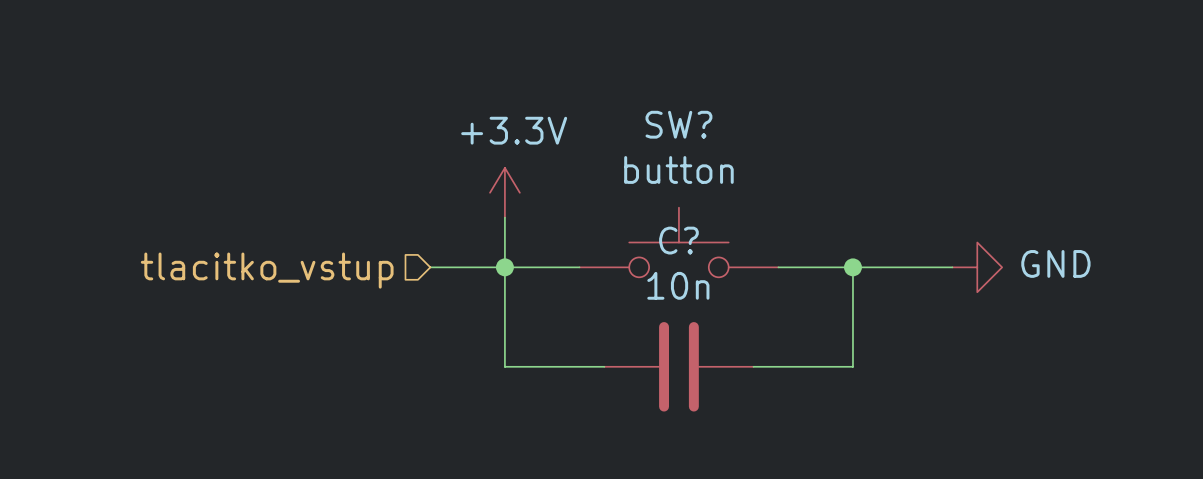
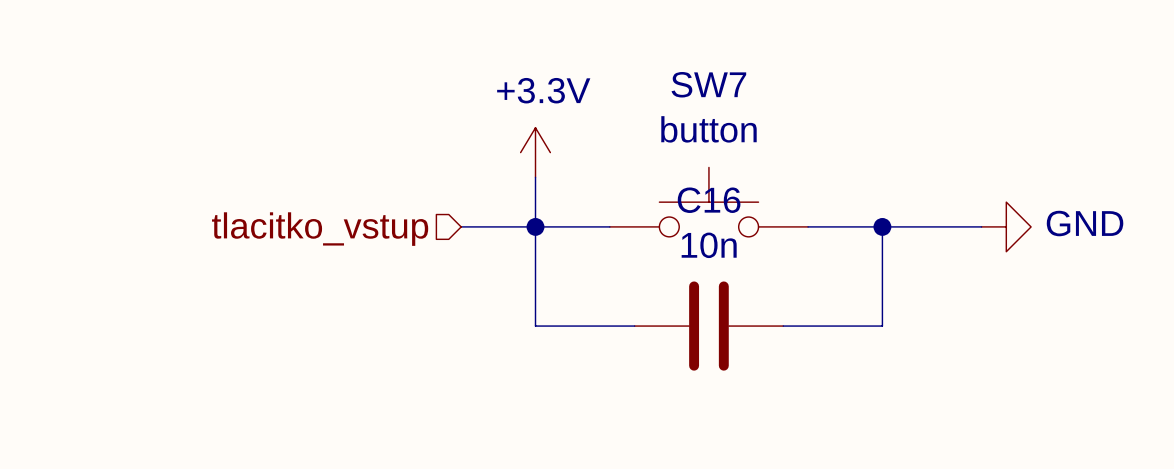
SW? name: SW? (678, 124) -> SW7 (708, 84)
C? name: C? (678, 240) -> C16 (709, 200)

